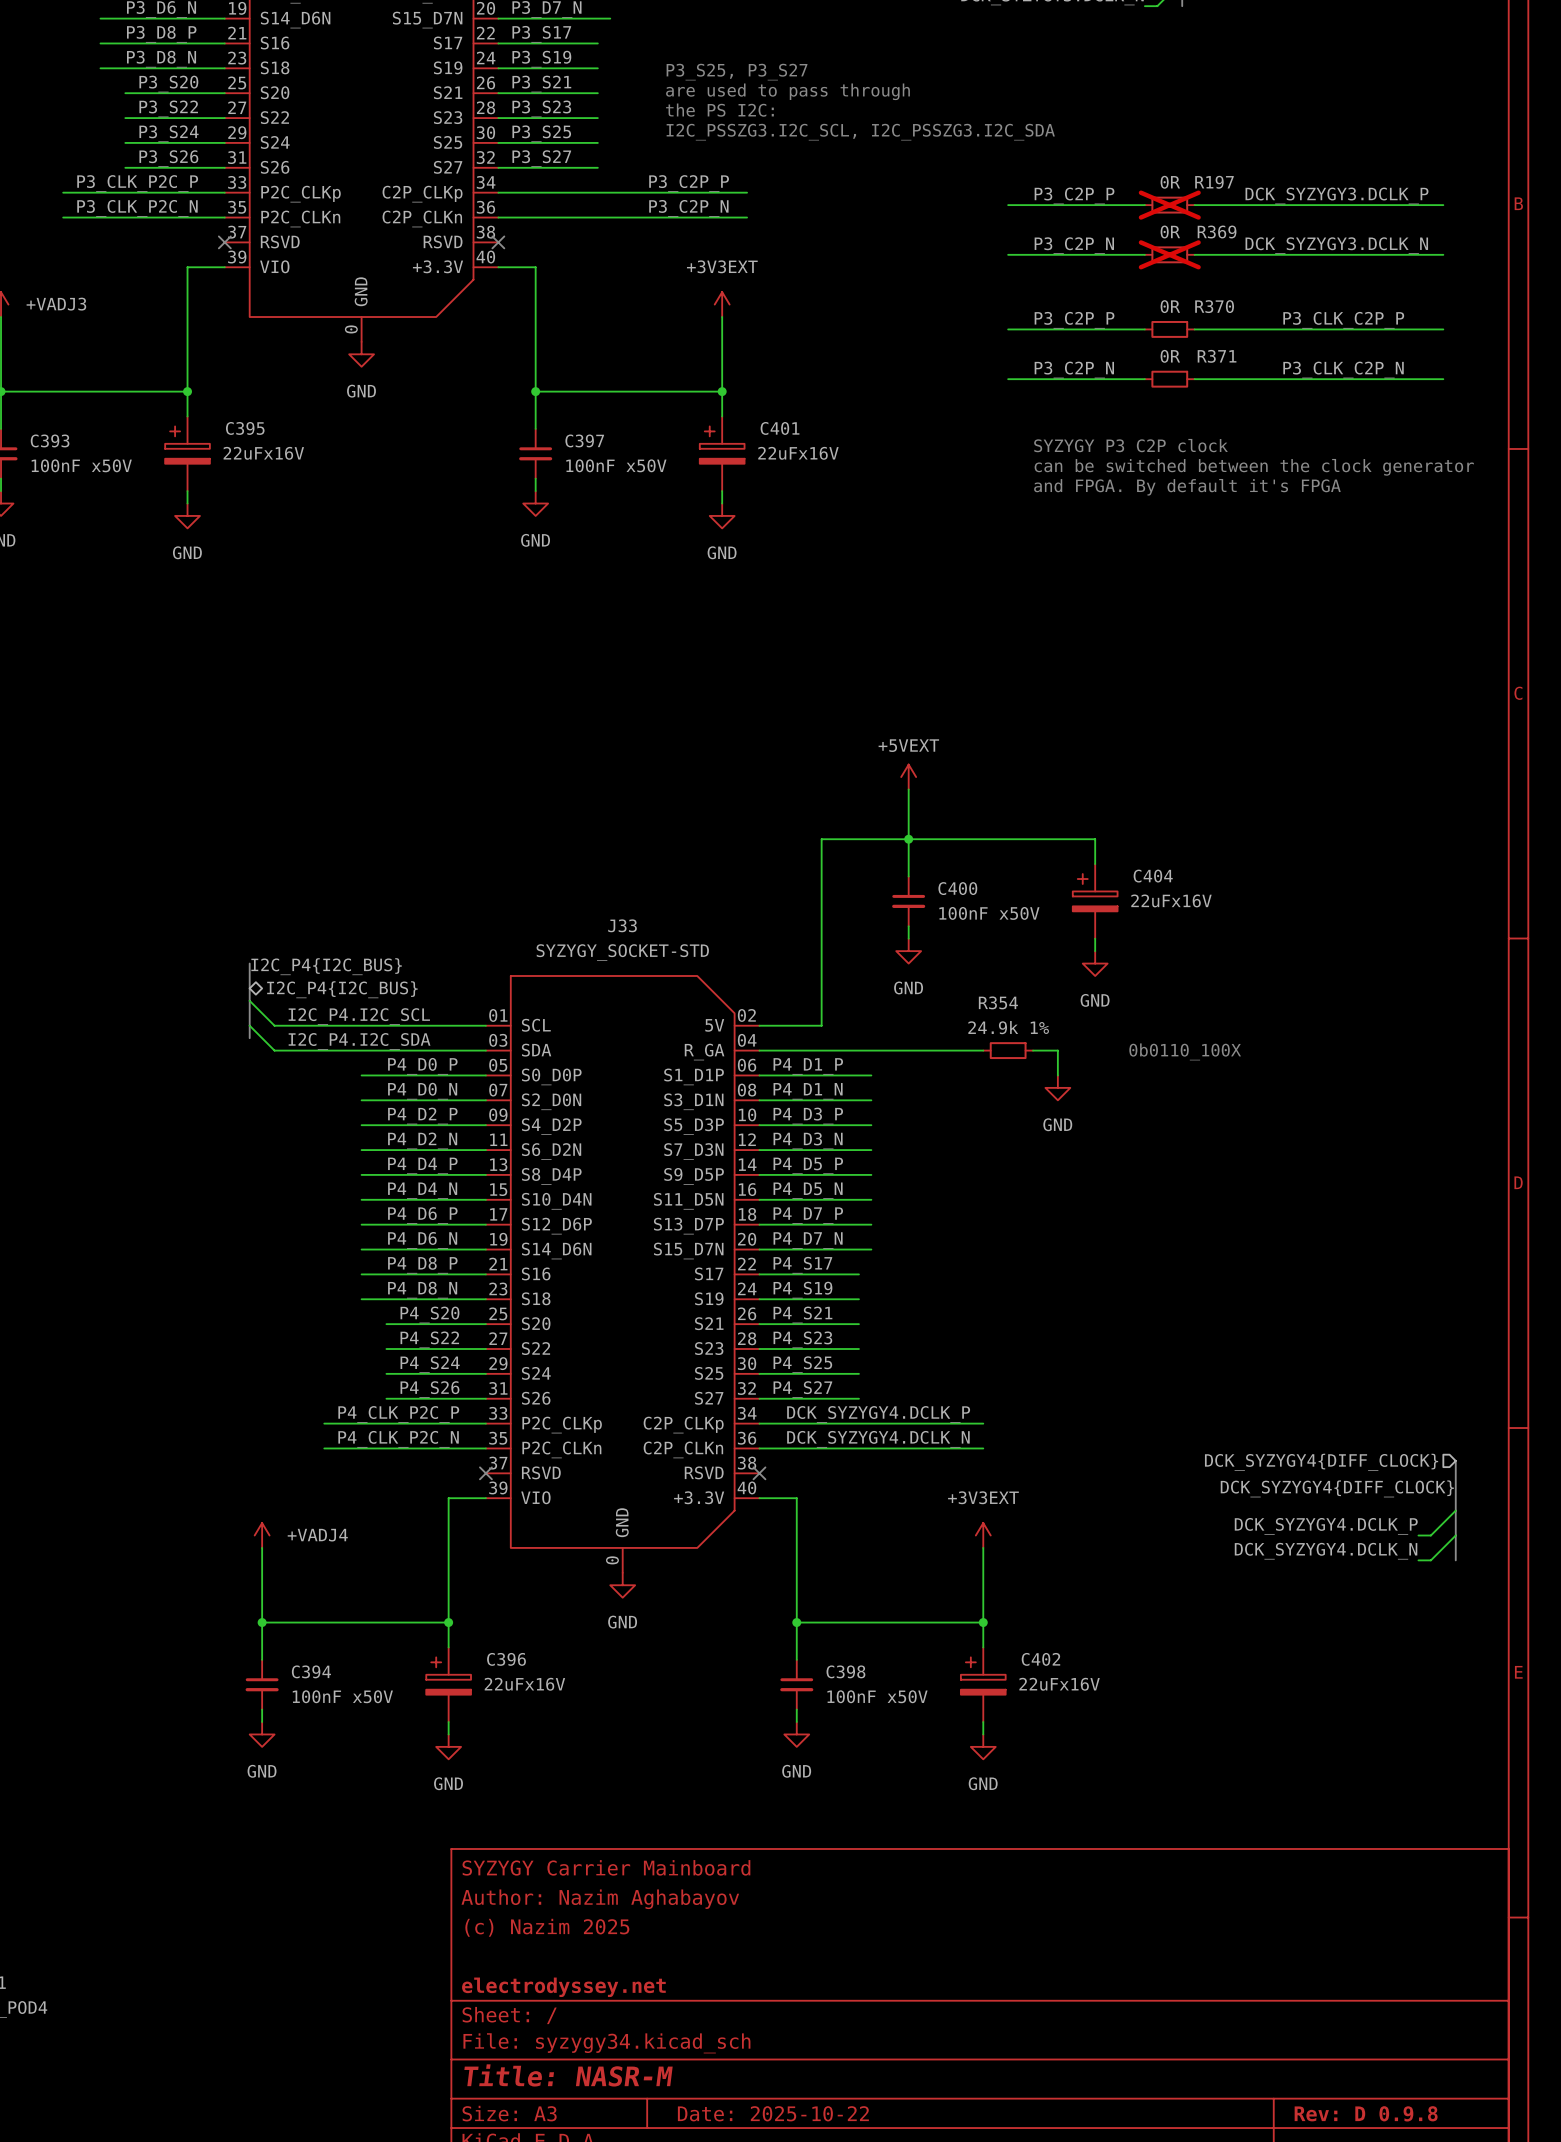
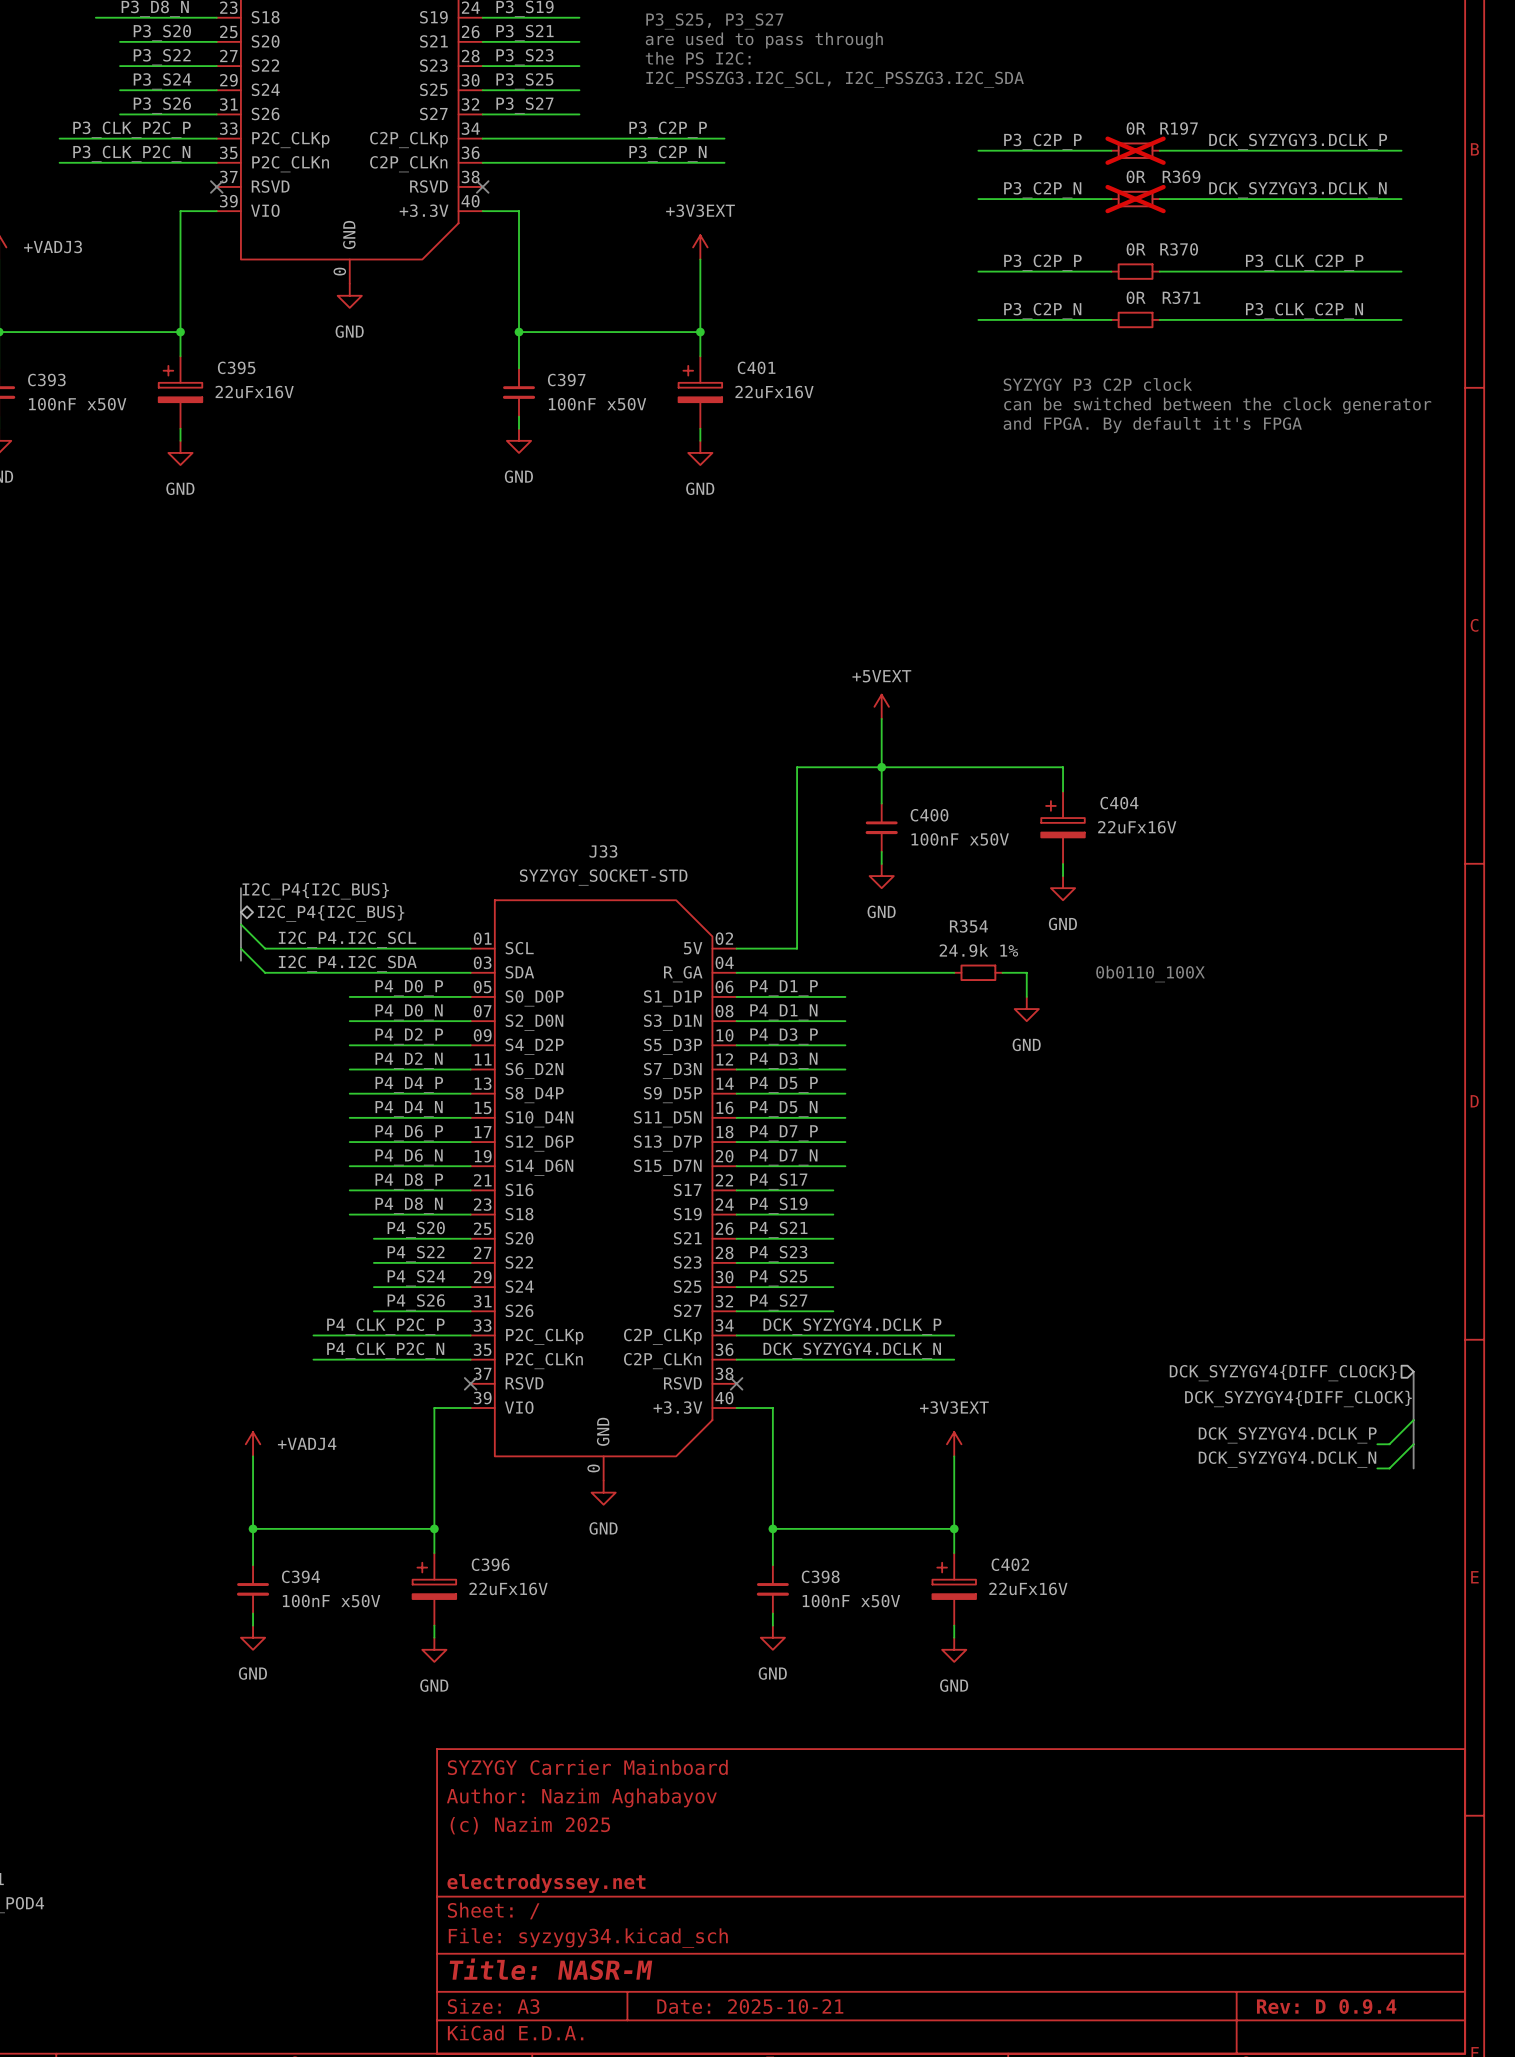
title block: Date: 2025-10-22 (773, 2113) -> Date: 2025-10-21 (750, 2006)
title block: Rev: D 0.9.8 (1366, 2113) -> Rev: D 0.9.4 (1326, 2006)

